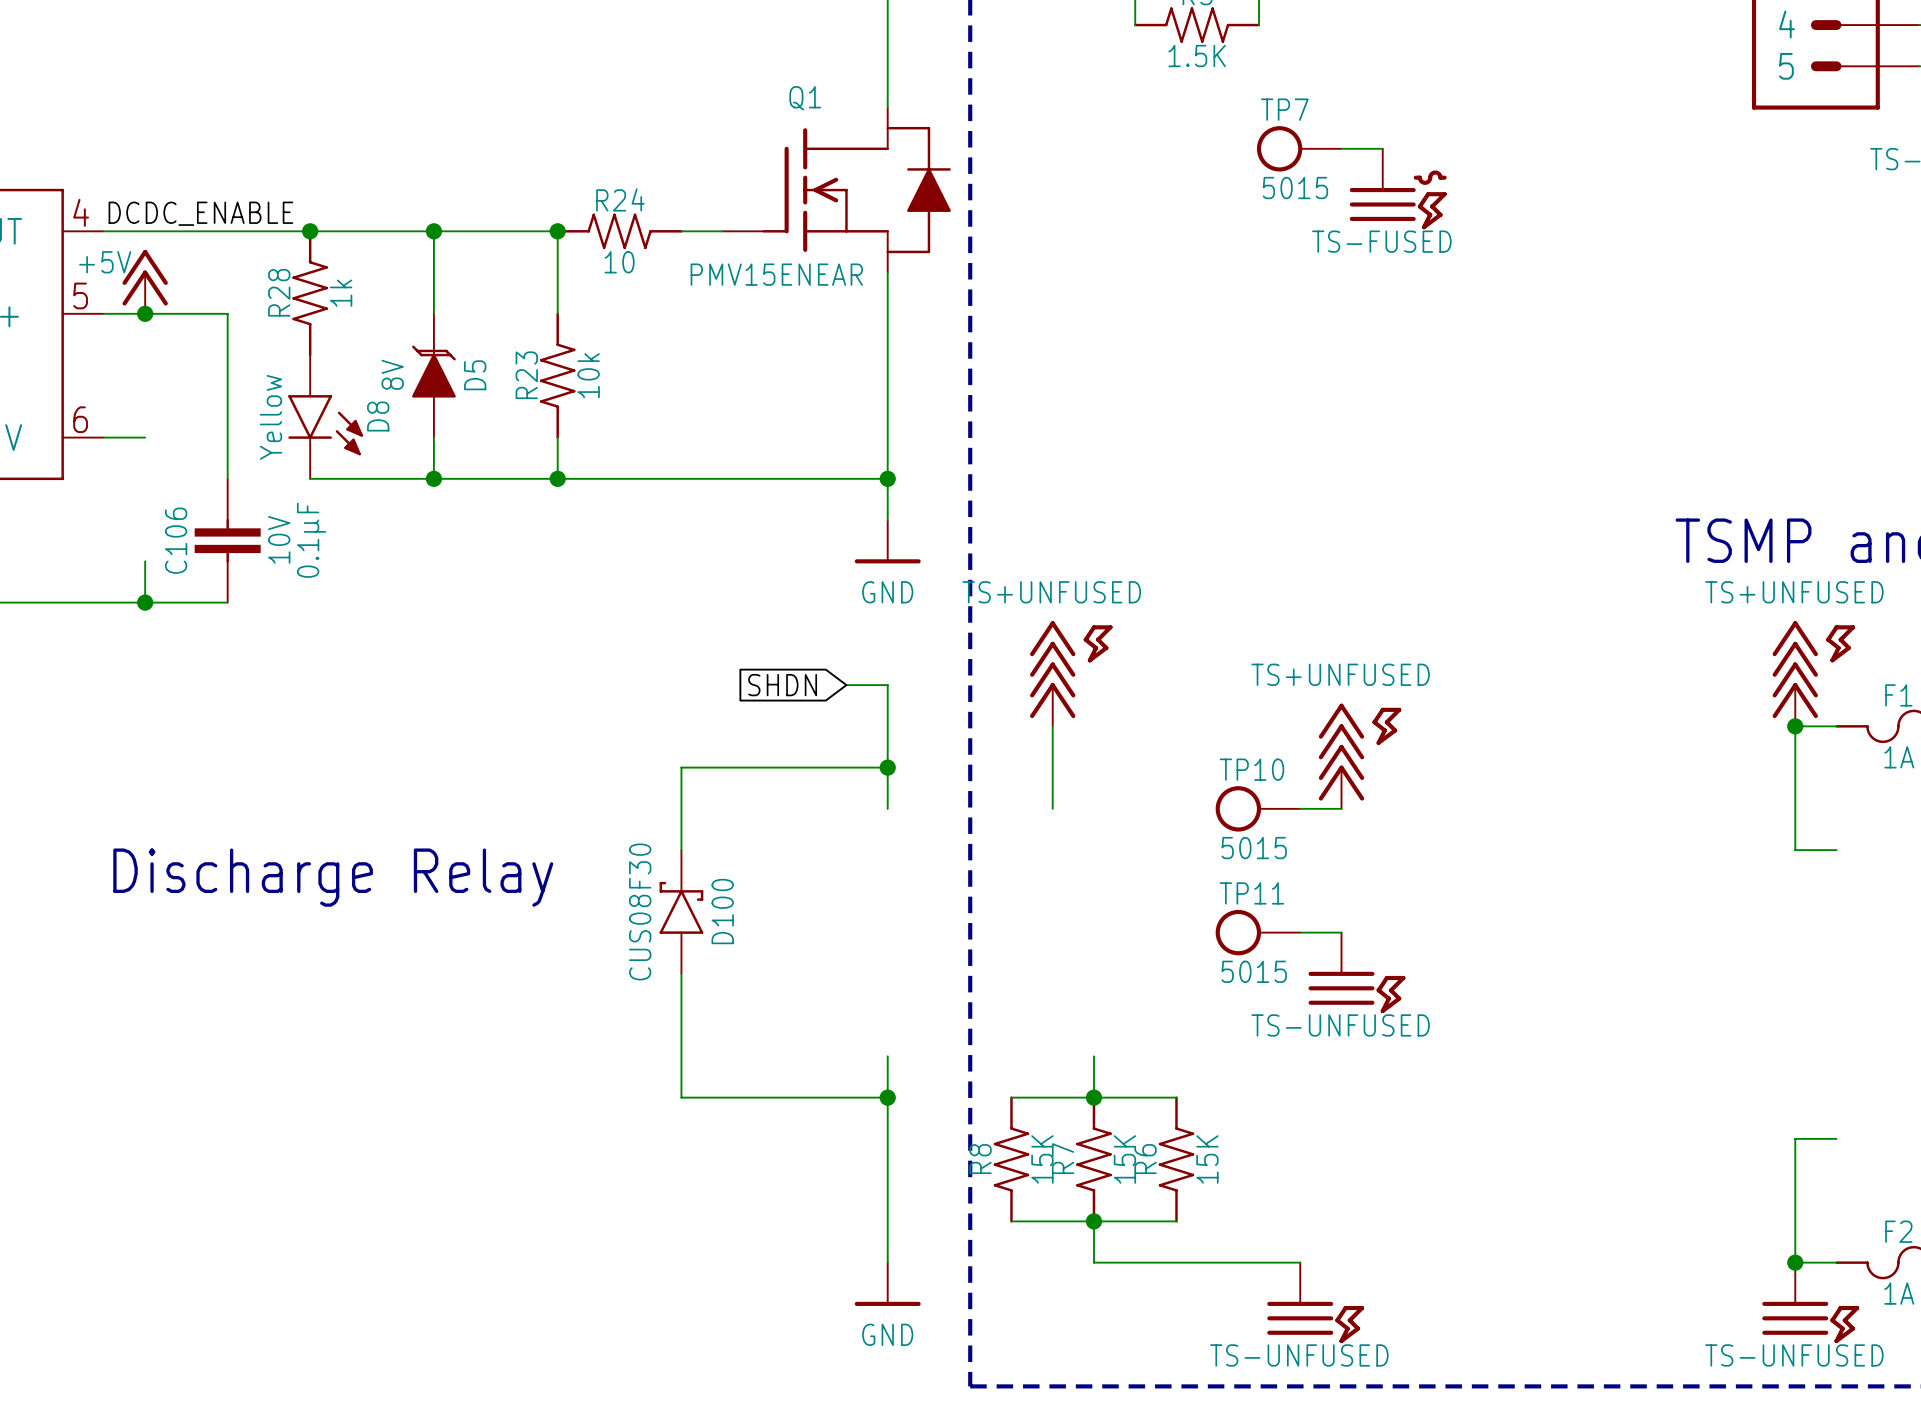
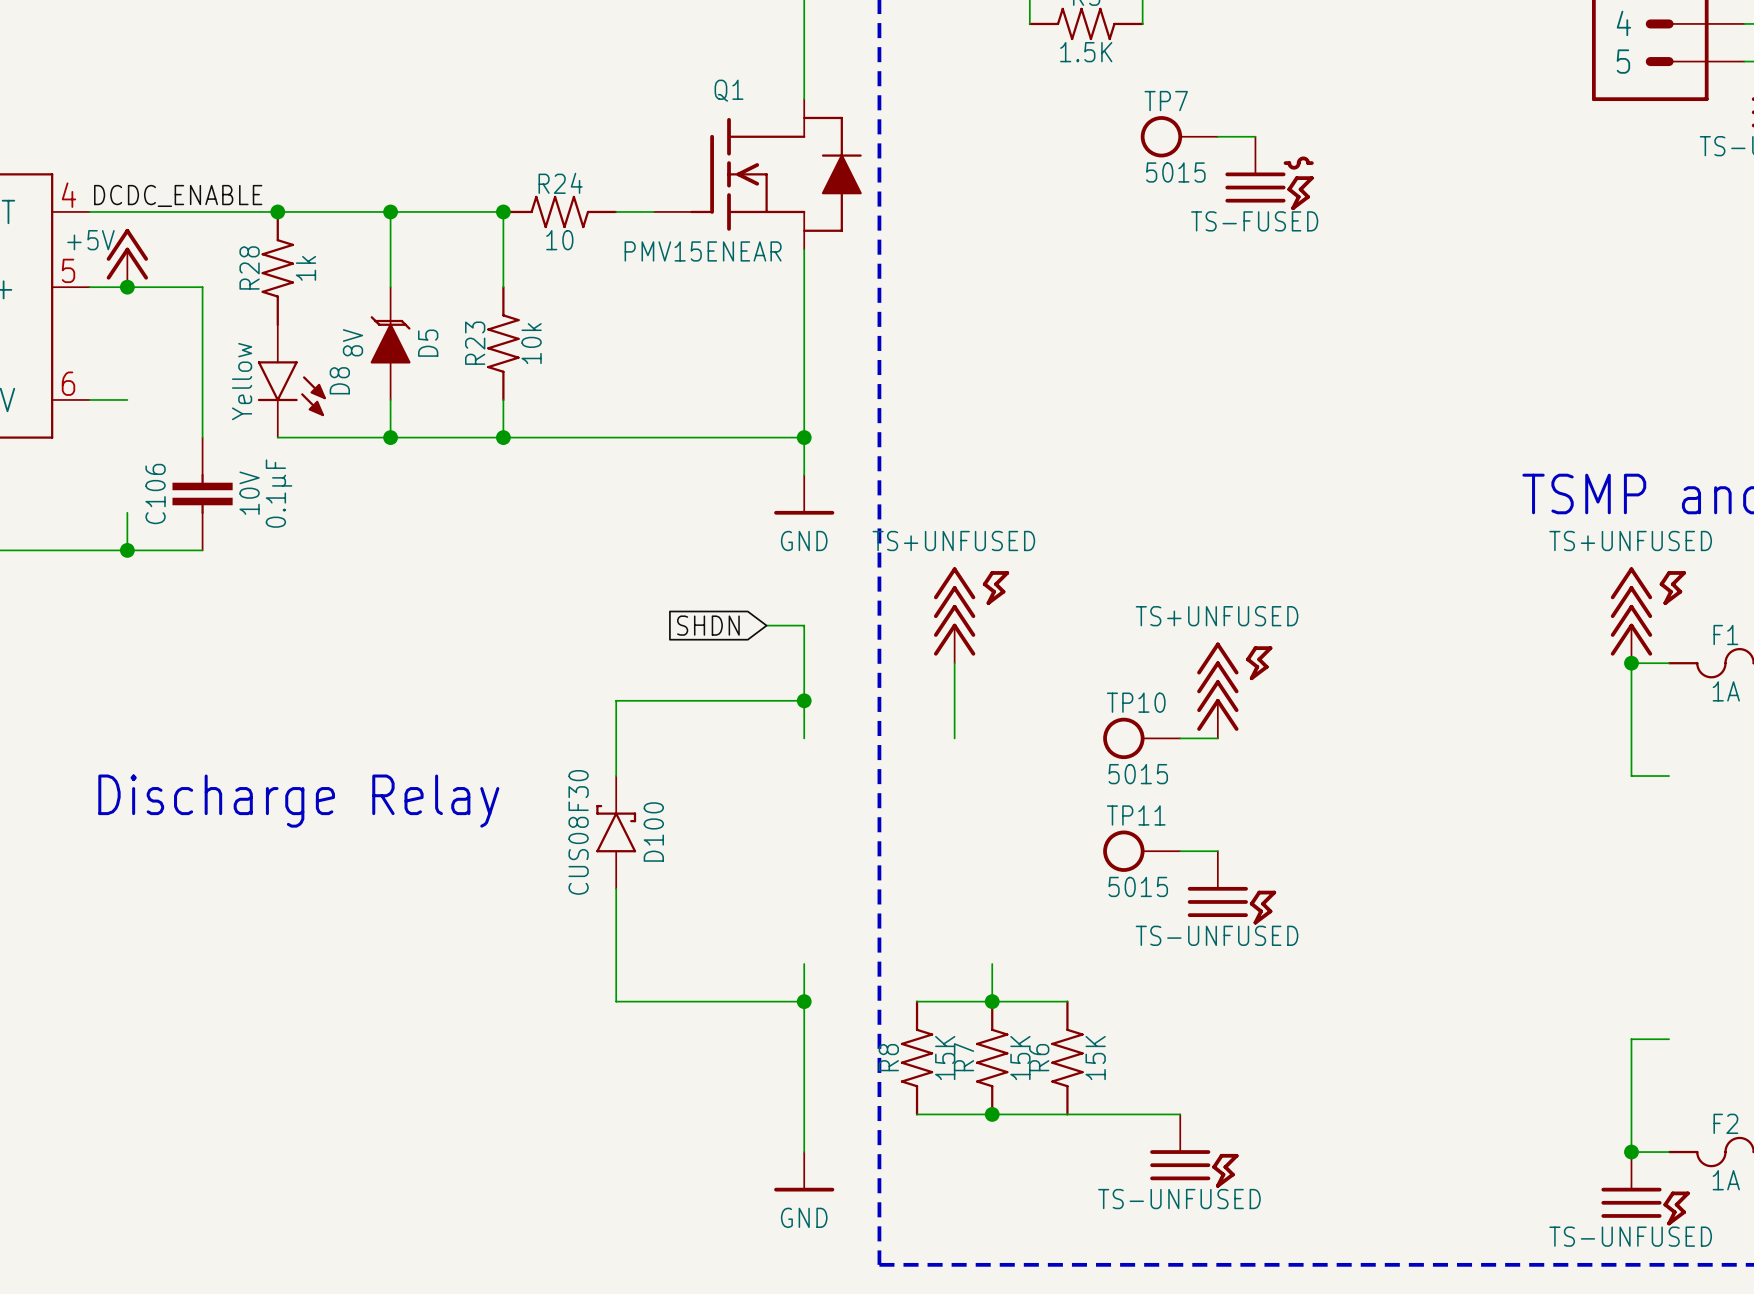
wire: (1093, 1221) (1093, 1262) (1300, 1262) -> none
wire: none -> (1067, 1114) (1180, 1114)
power symbol position: TS-UNFUSED (1315, 1302) -> TS-UNFUSED (1194, 1151)

